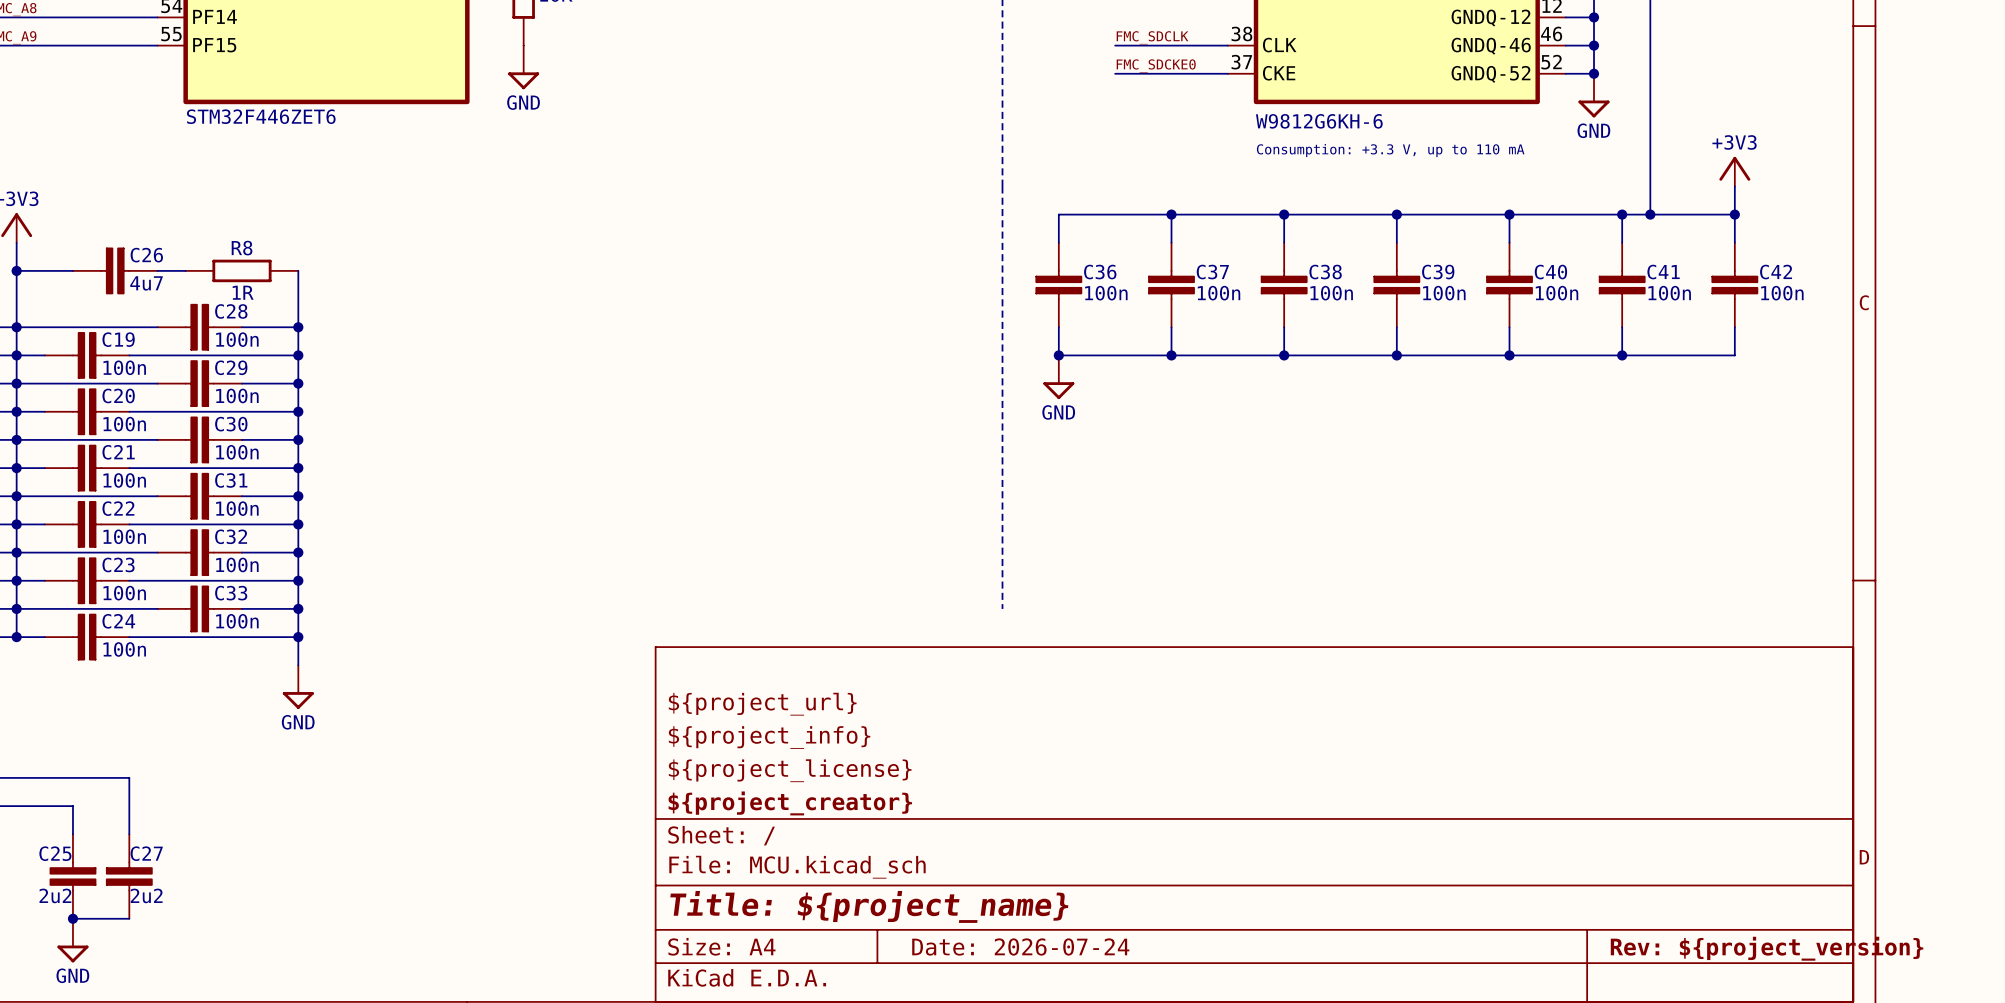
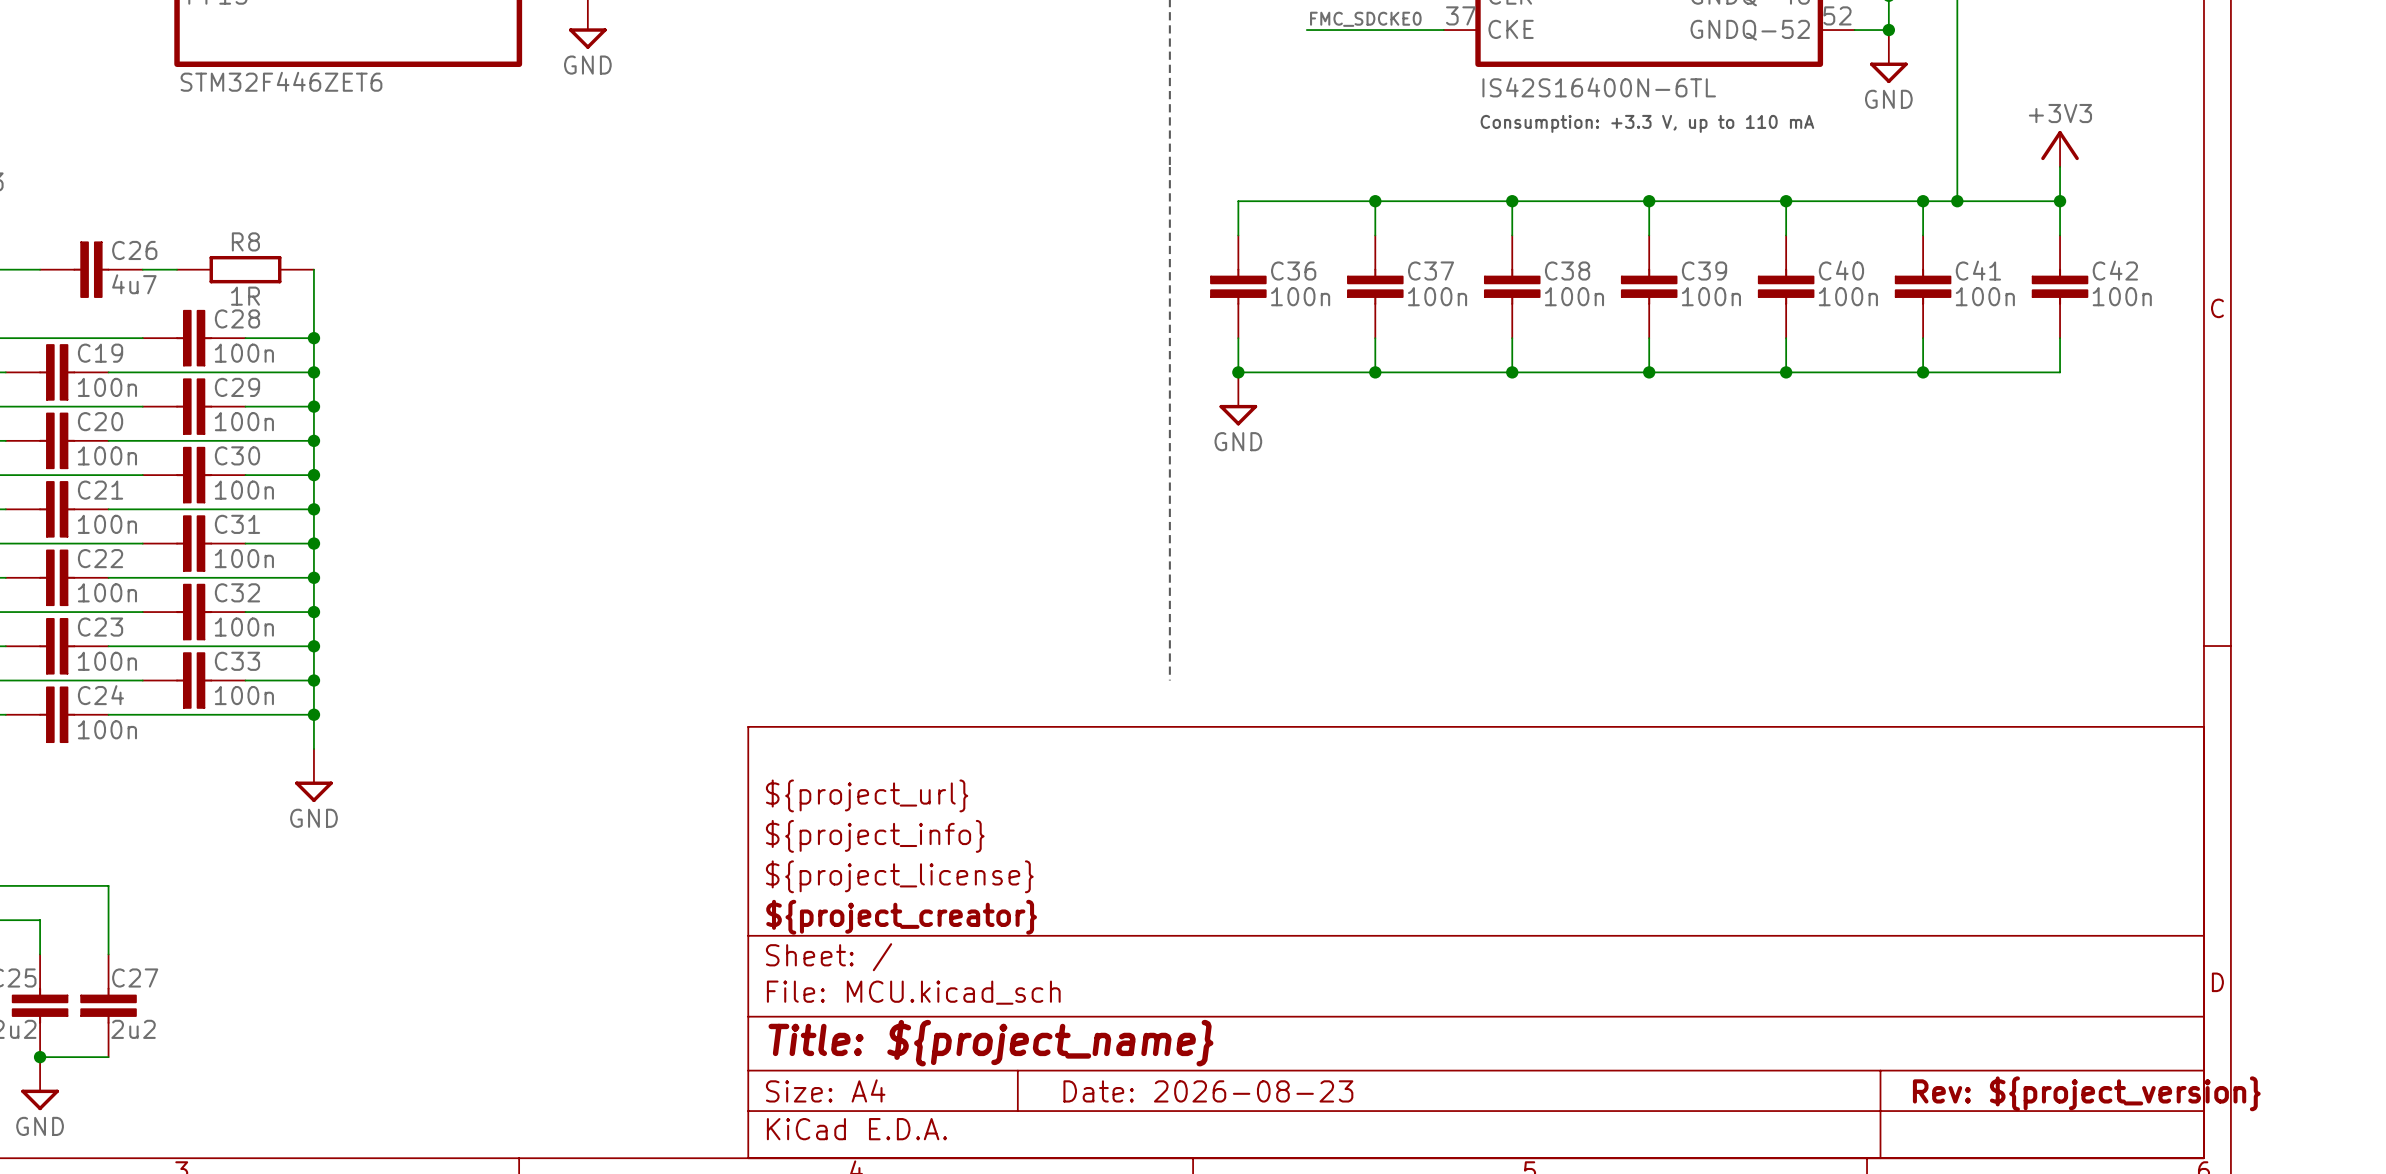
part value: W9812G6KH-6 (1319, 121) -> IS42S16400N-6TL (1599, 87)
title block: Date: 2026-07-24 (1020, 946) -> Date: 2026-08-23 (1208, 1091)

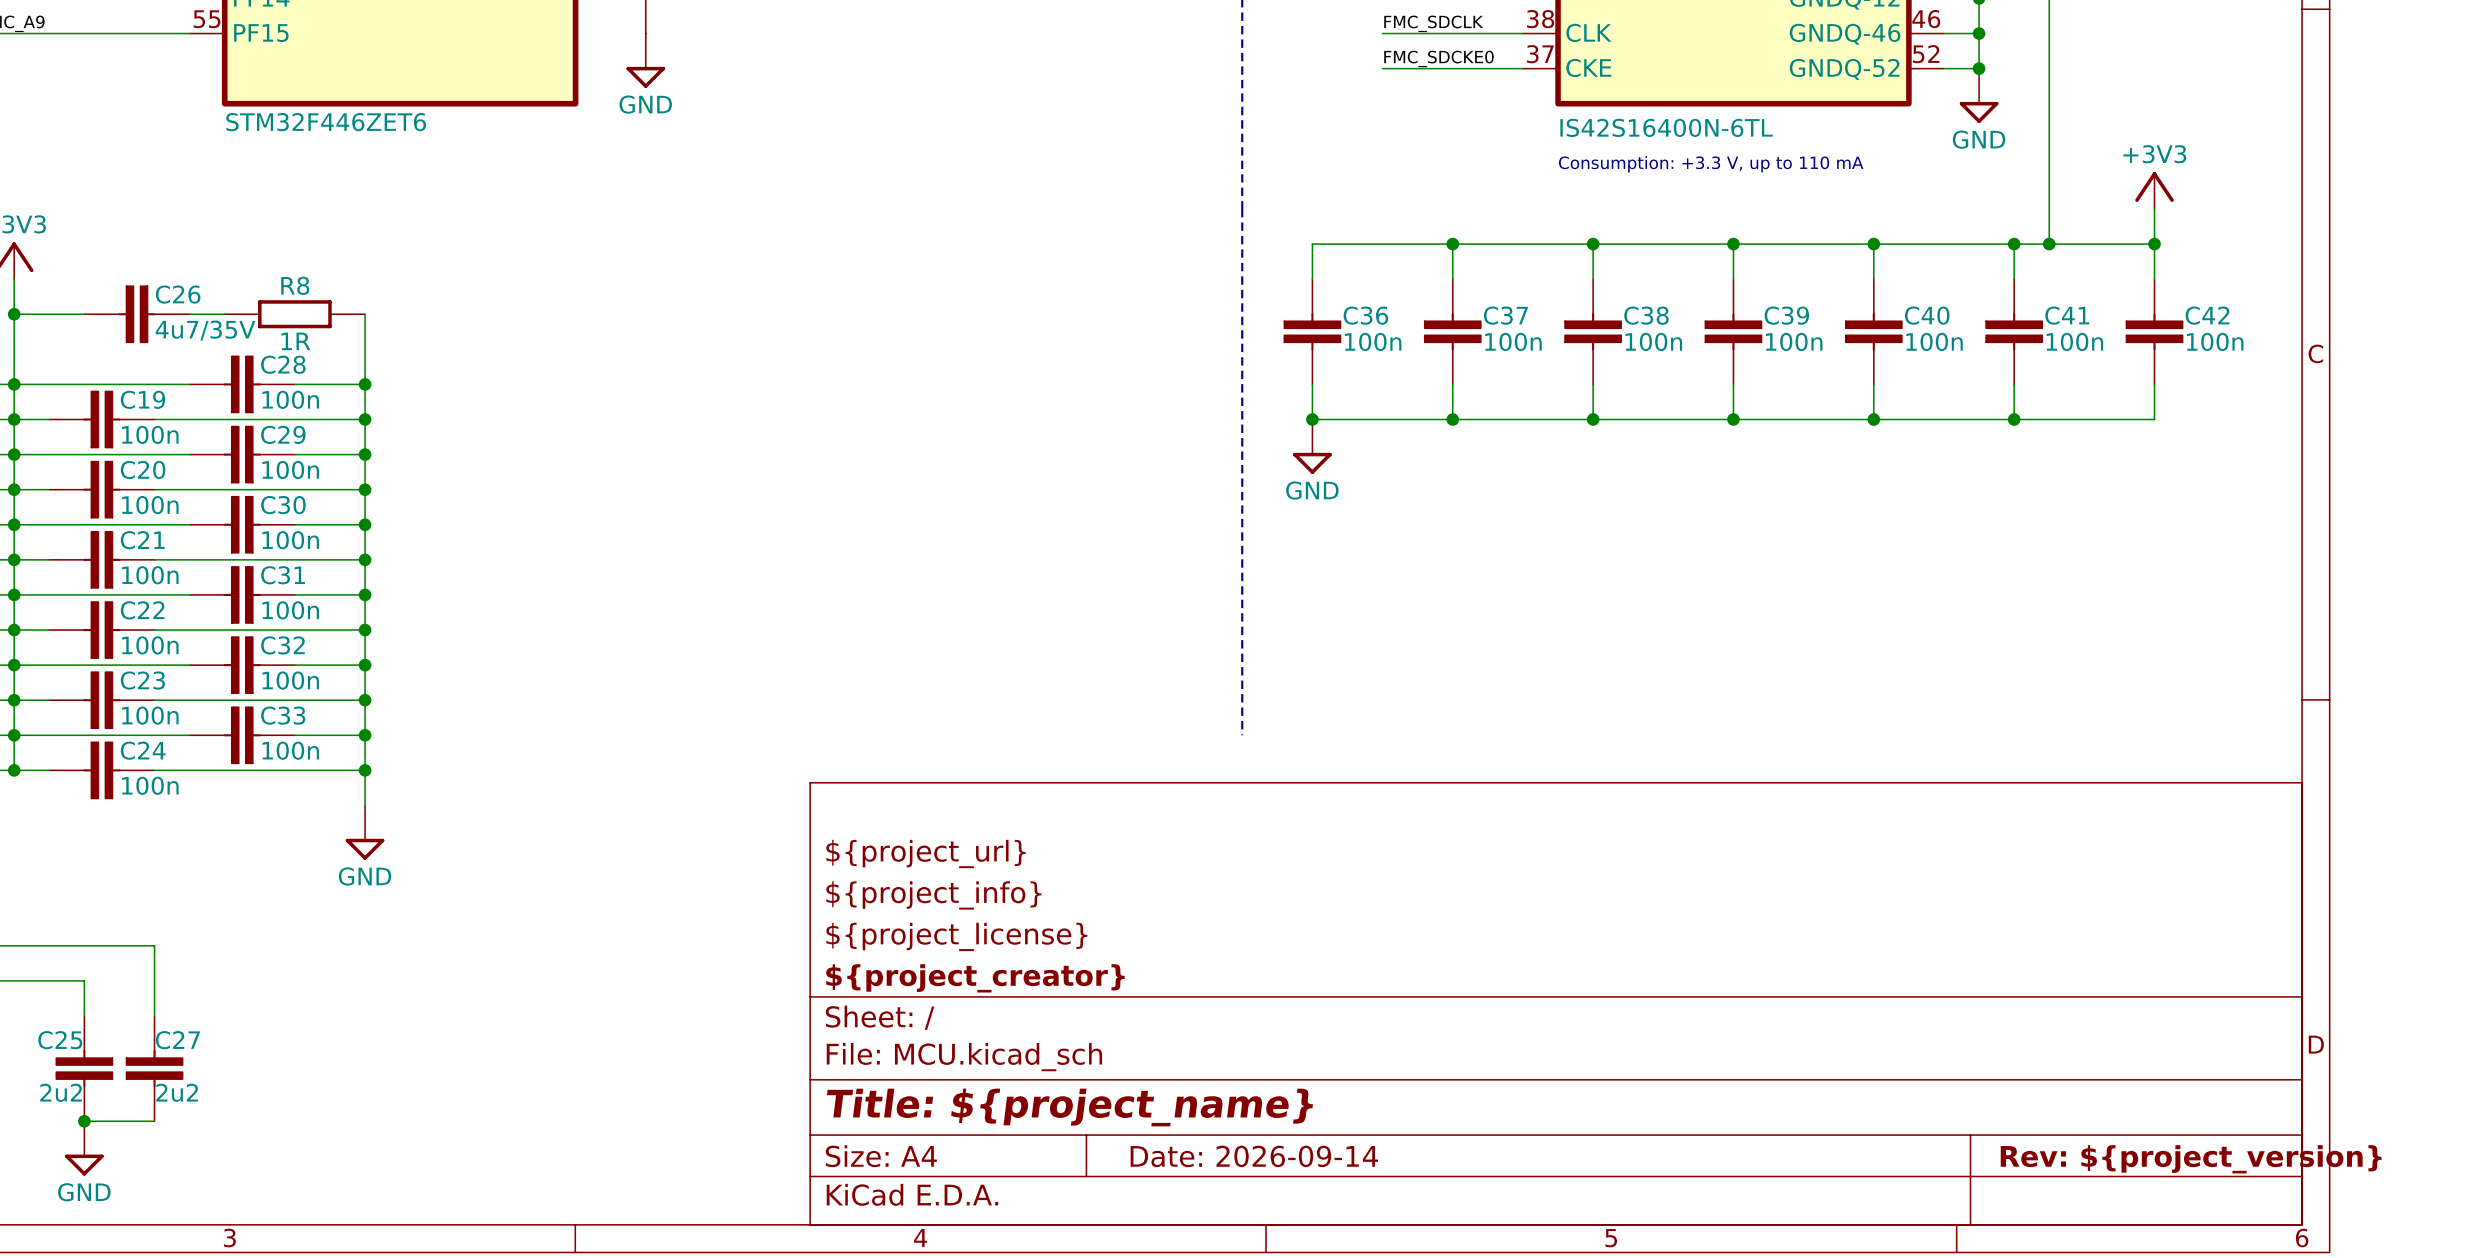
C26 value: 4u7 (134, 284) -> 4u7/35V (205, 330)
title block: Date: 2026-08-23 (1208, 1091) -> Date: 2026-09-14 (1254, 1156)

